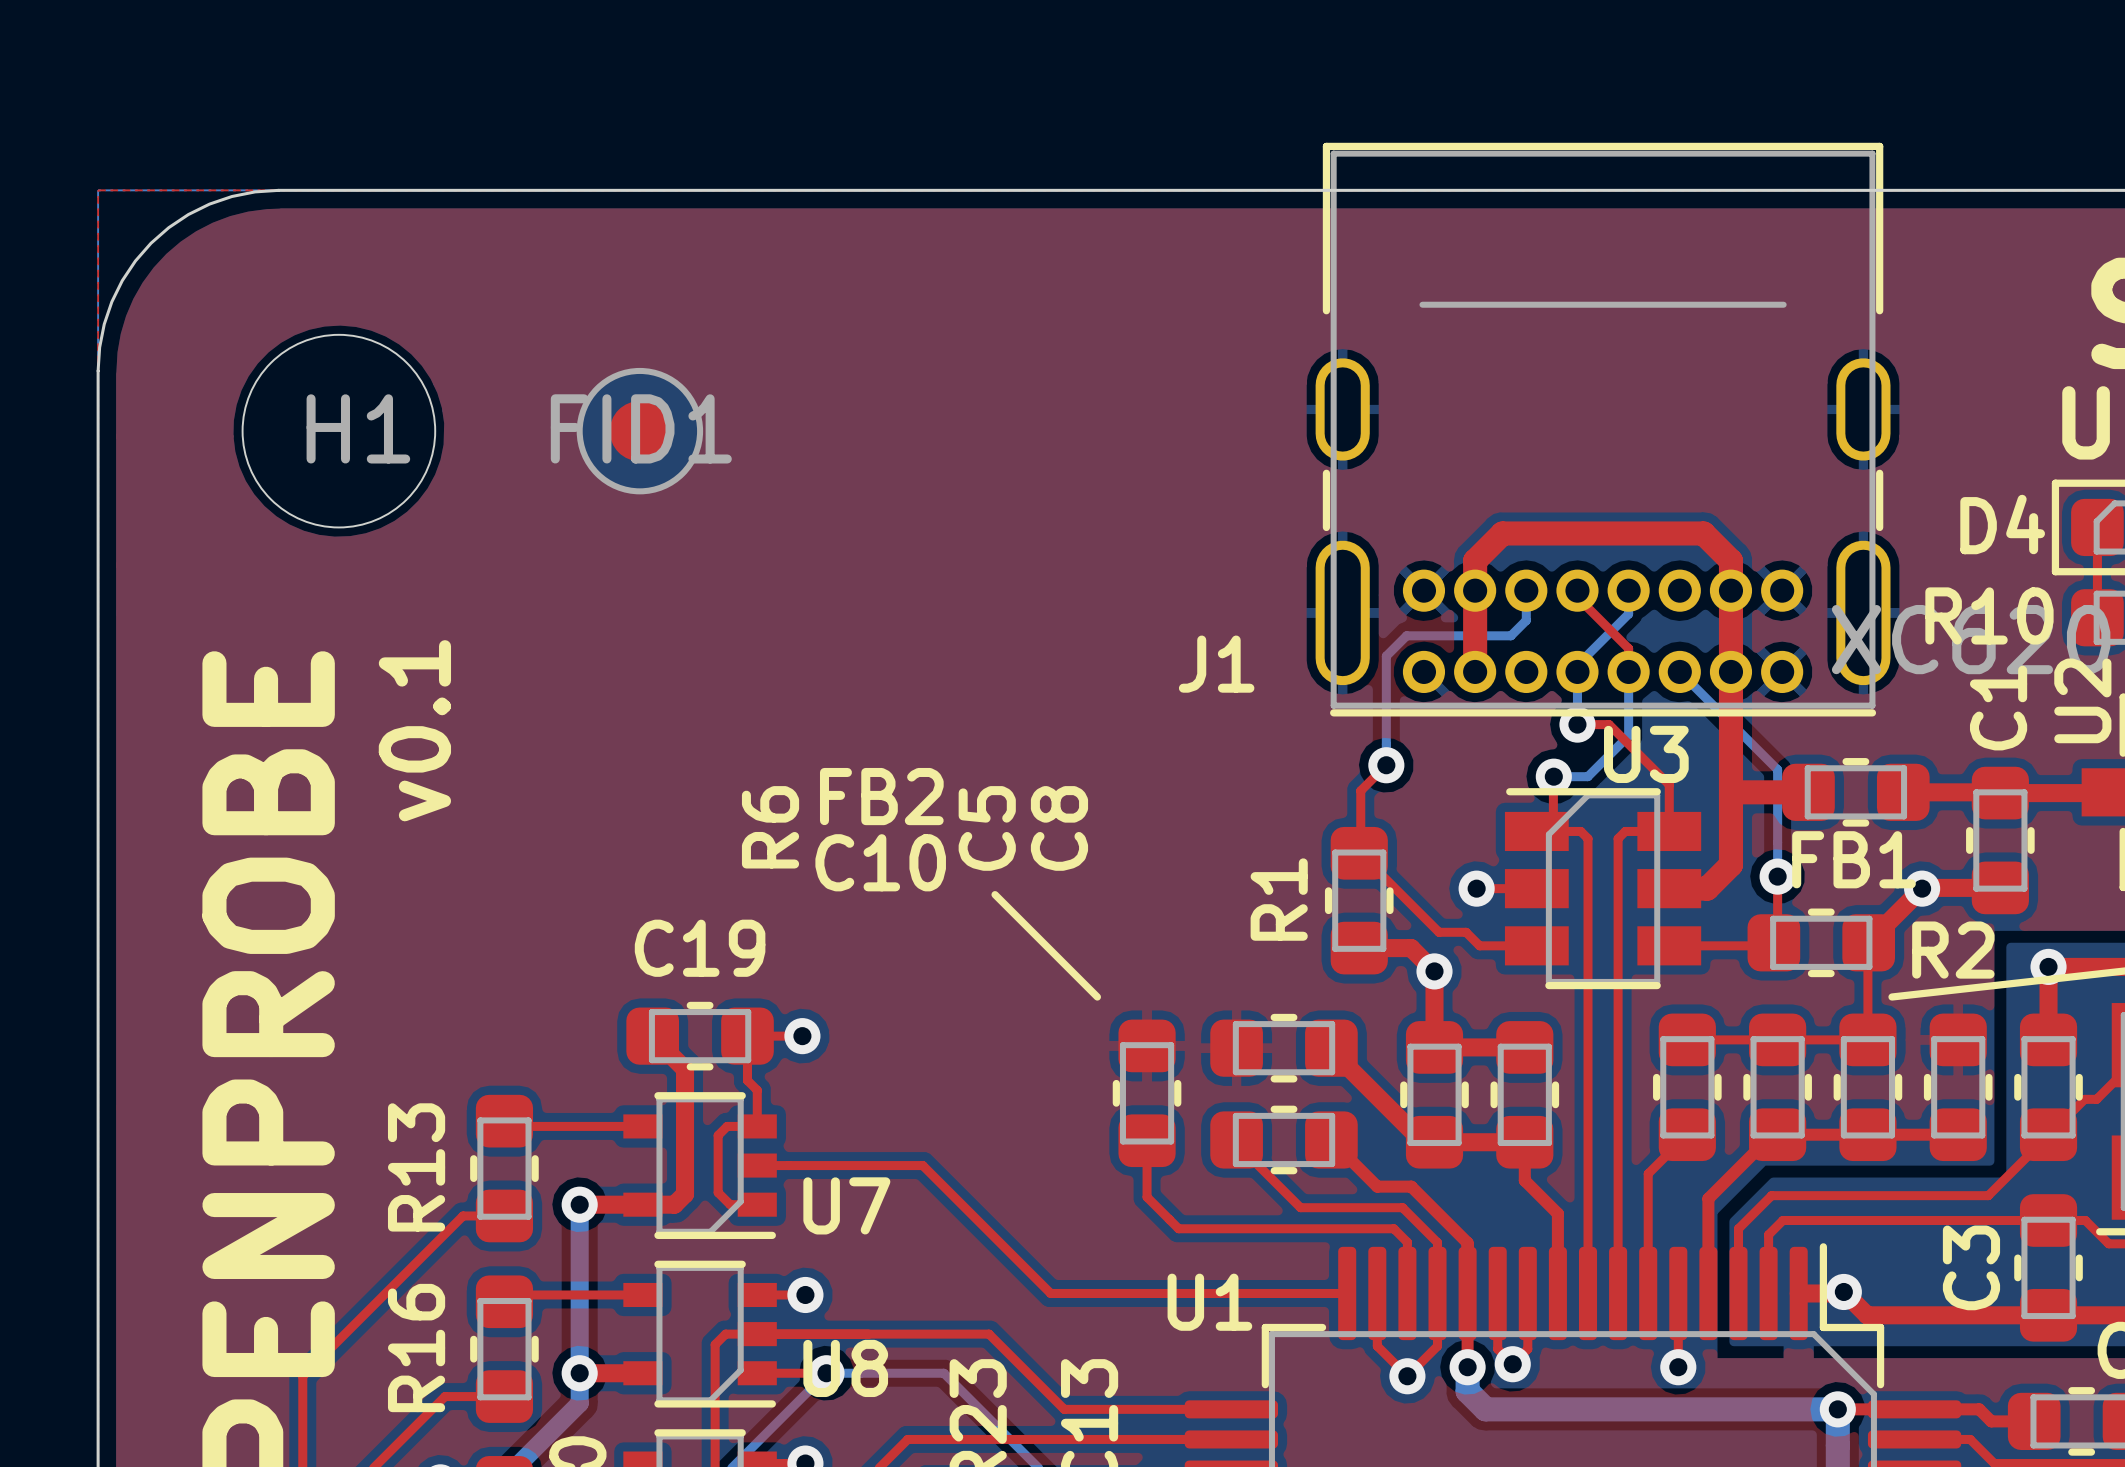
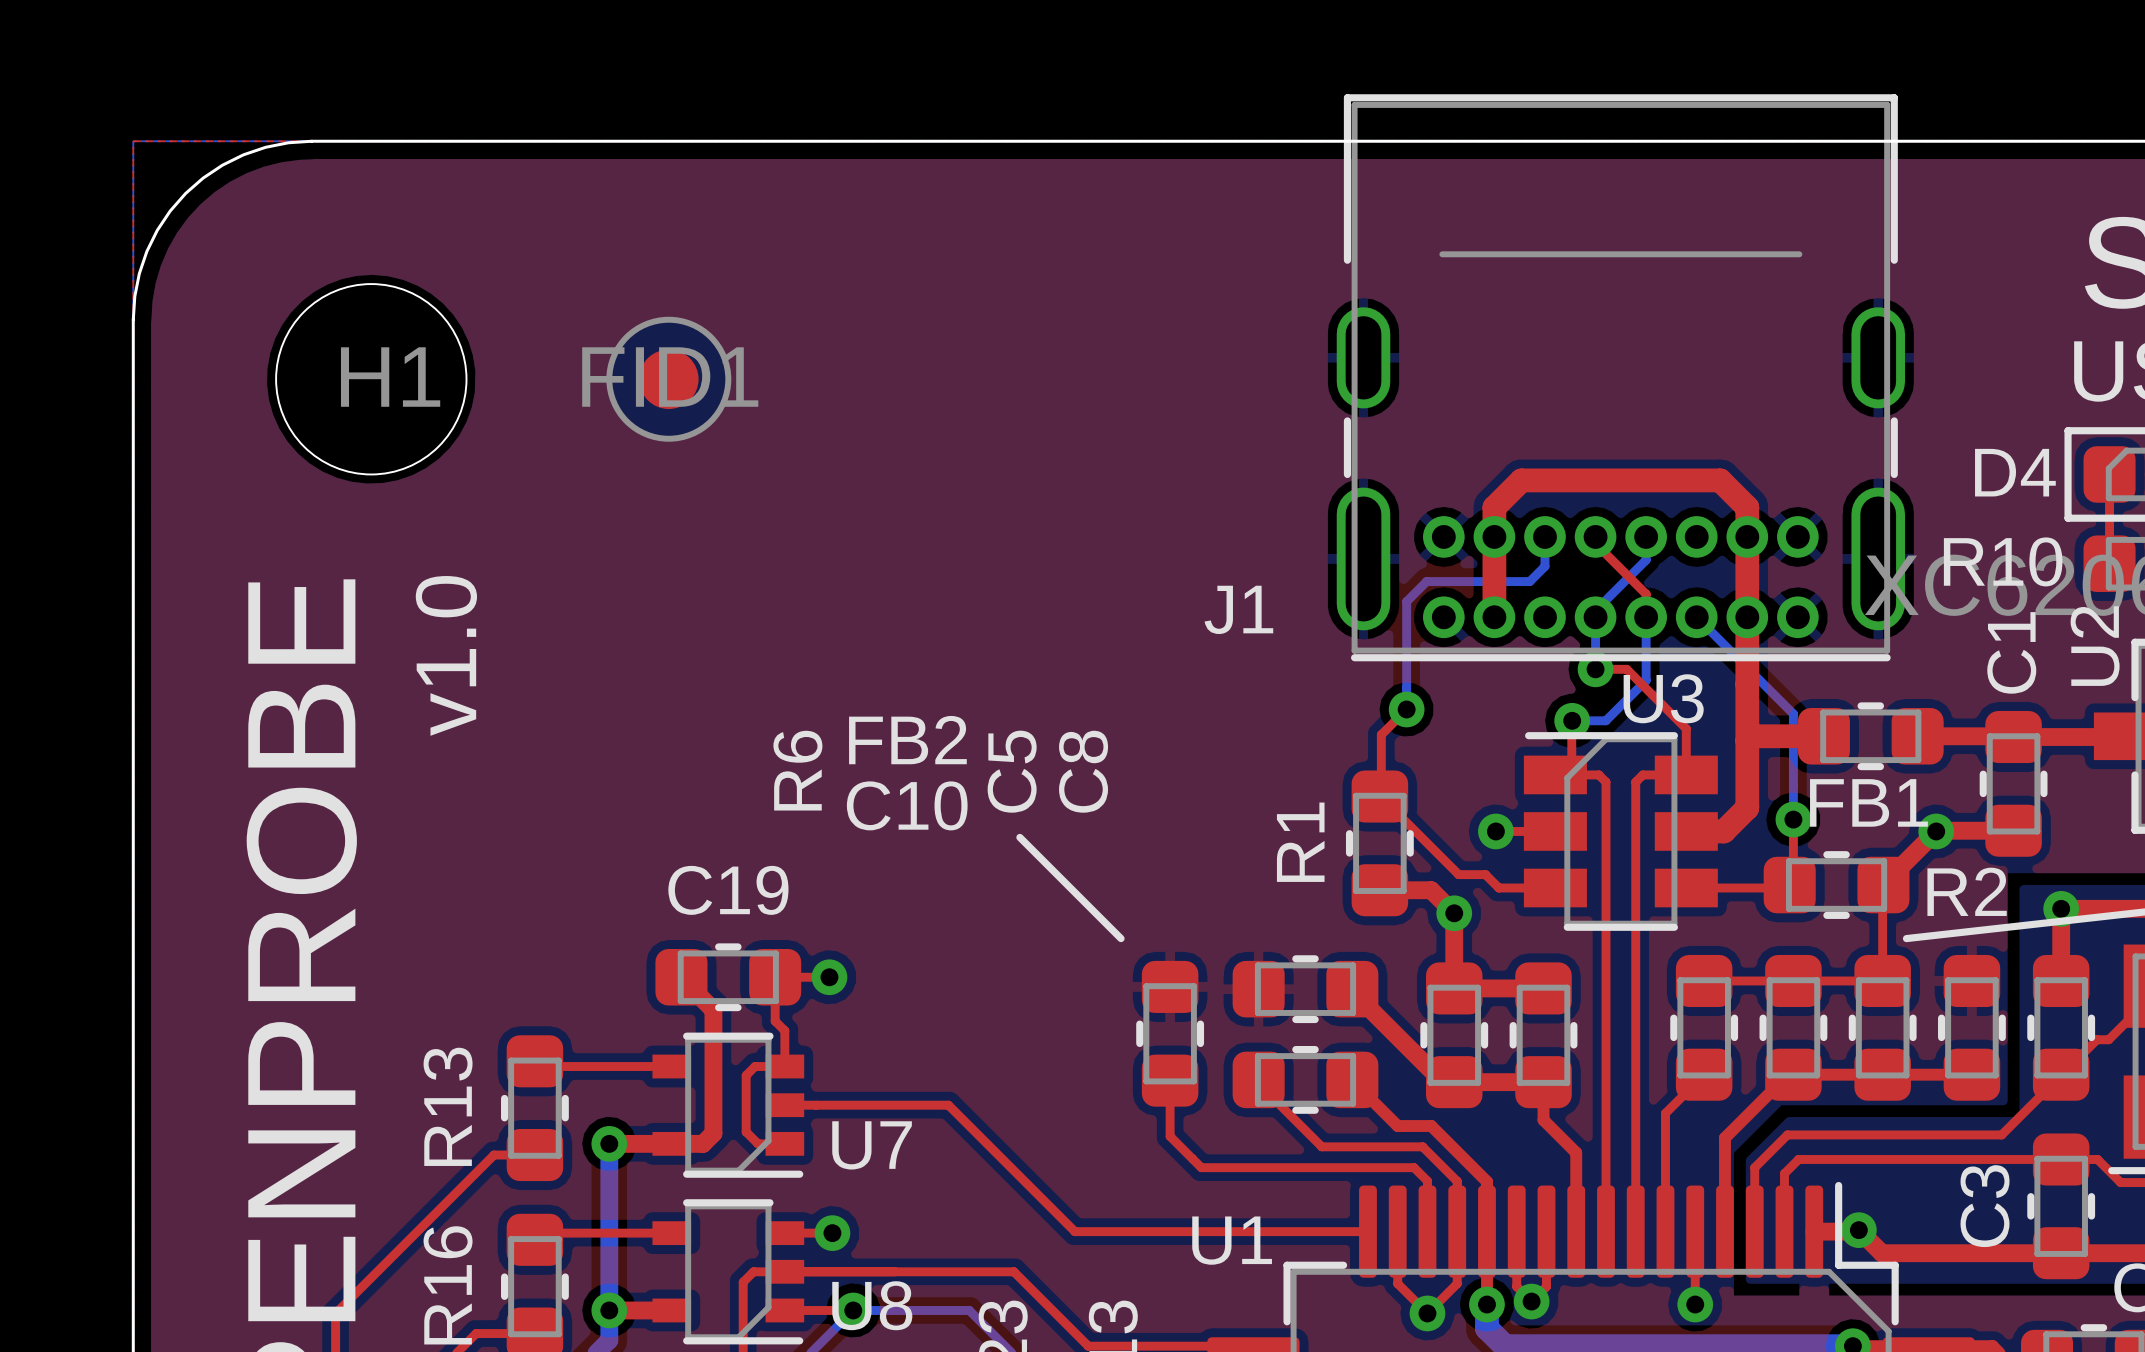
text: v0.1 (414, 730) -> v1.0 (446, 655)

